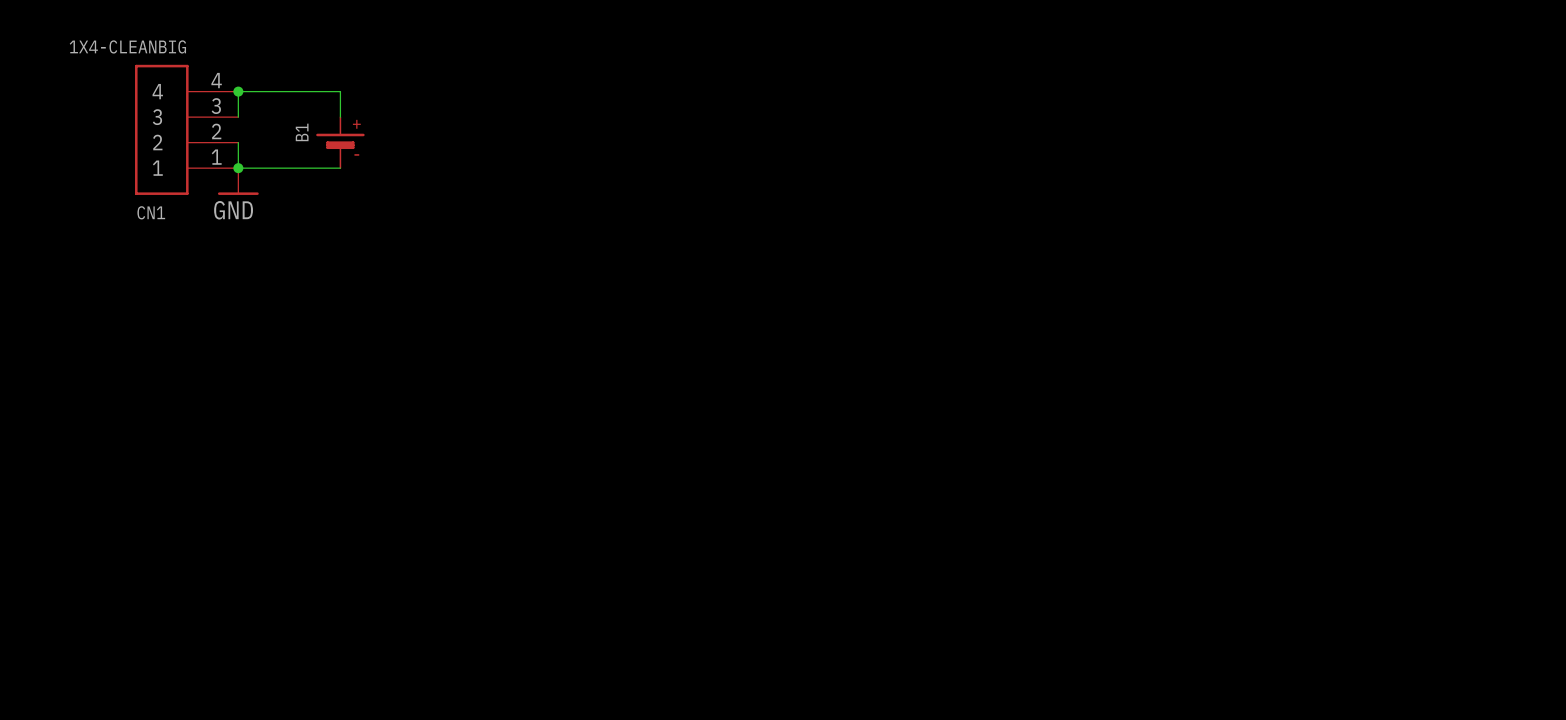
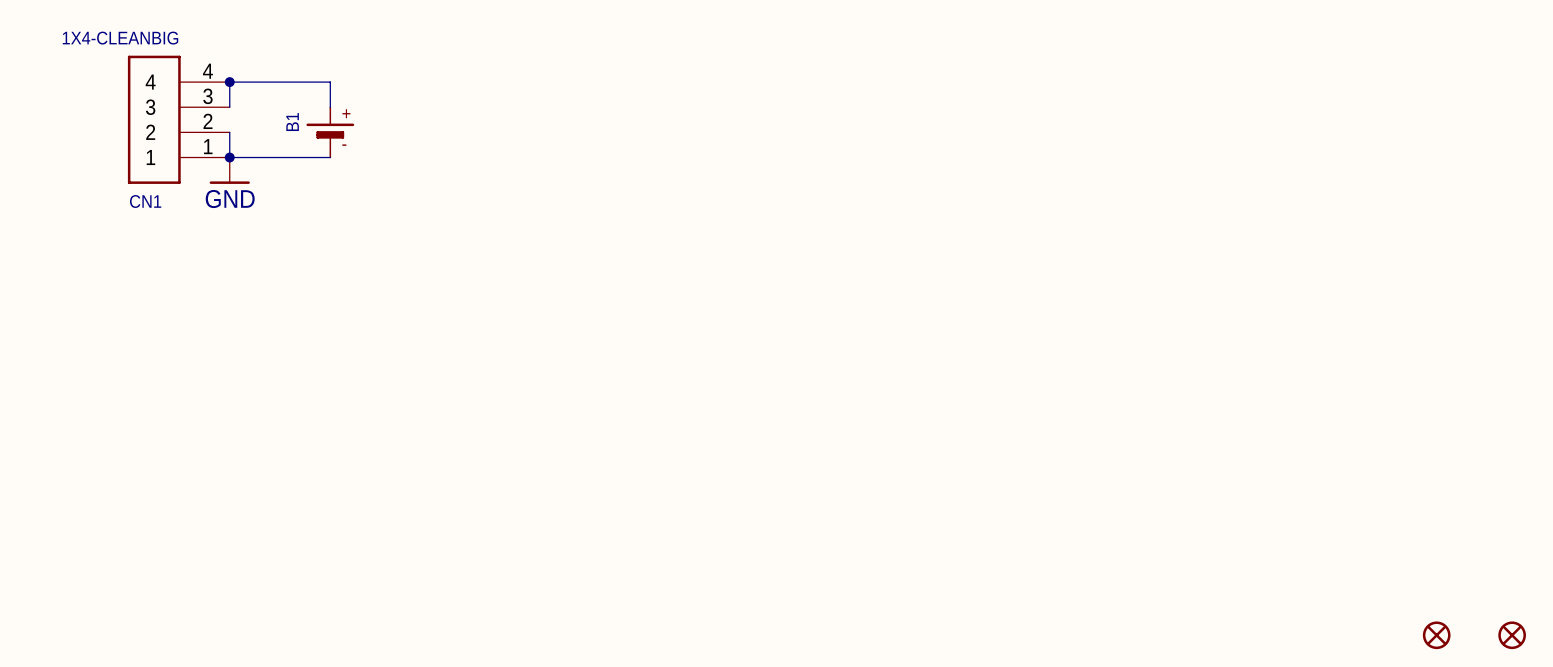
part: none -> (1436, 635)
part: none -> (1512, 635)

